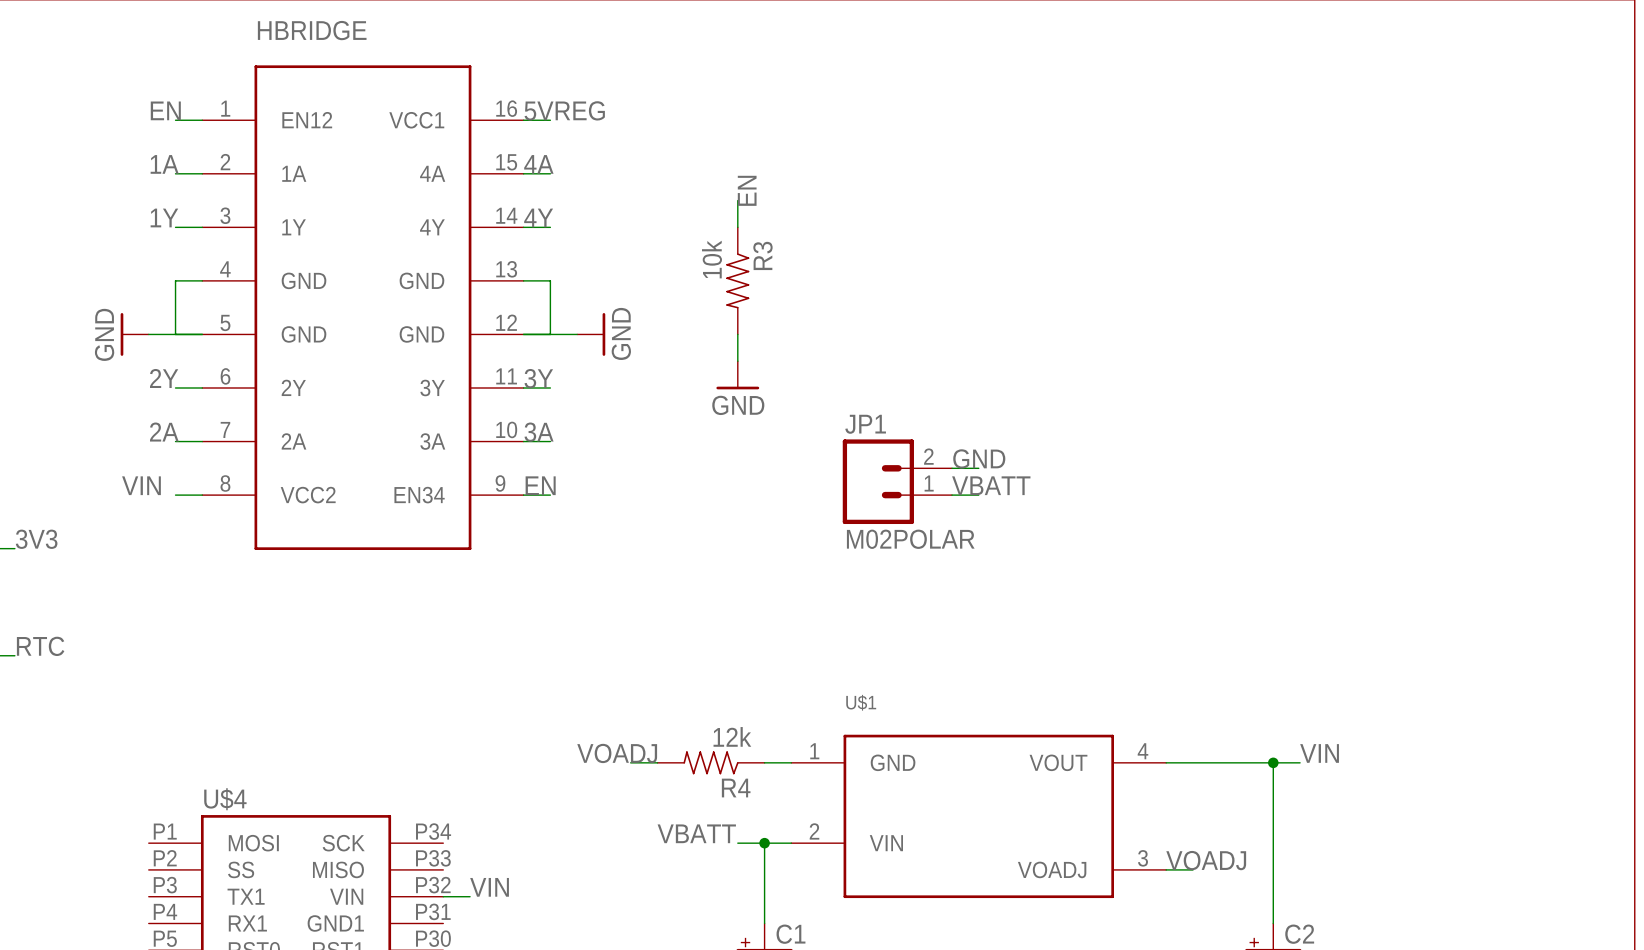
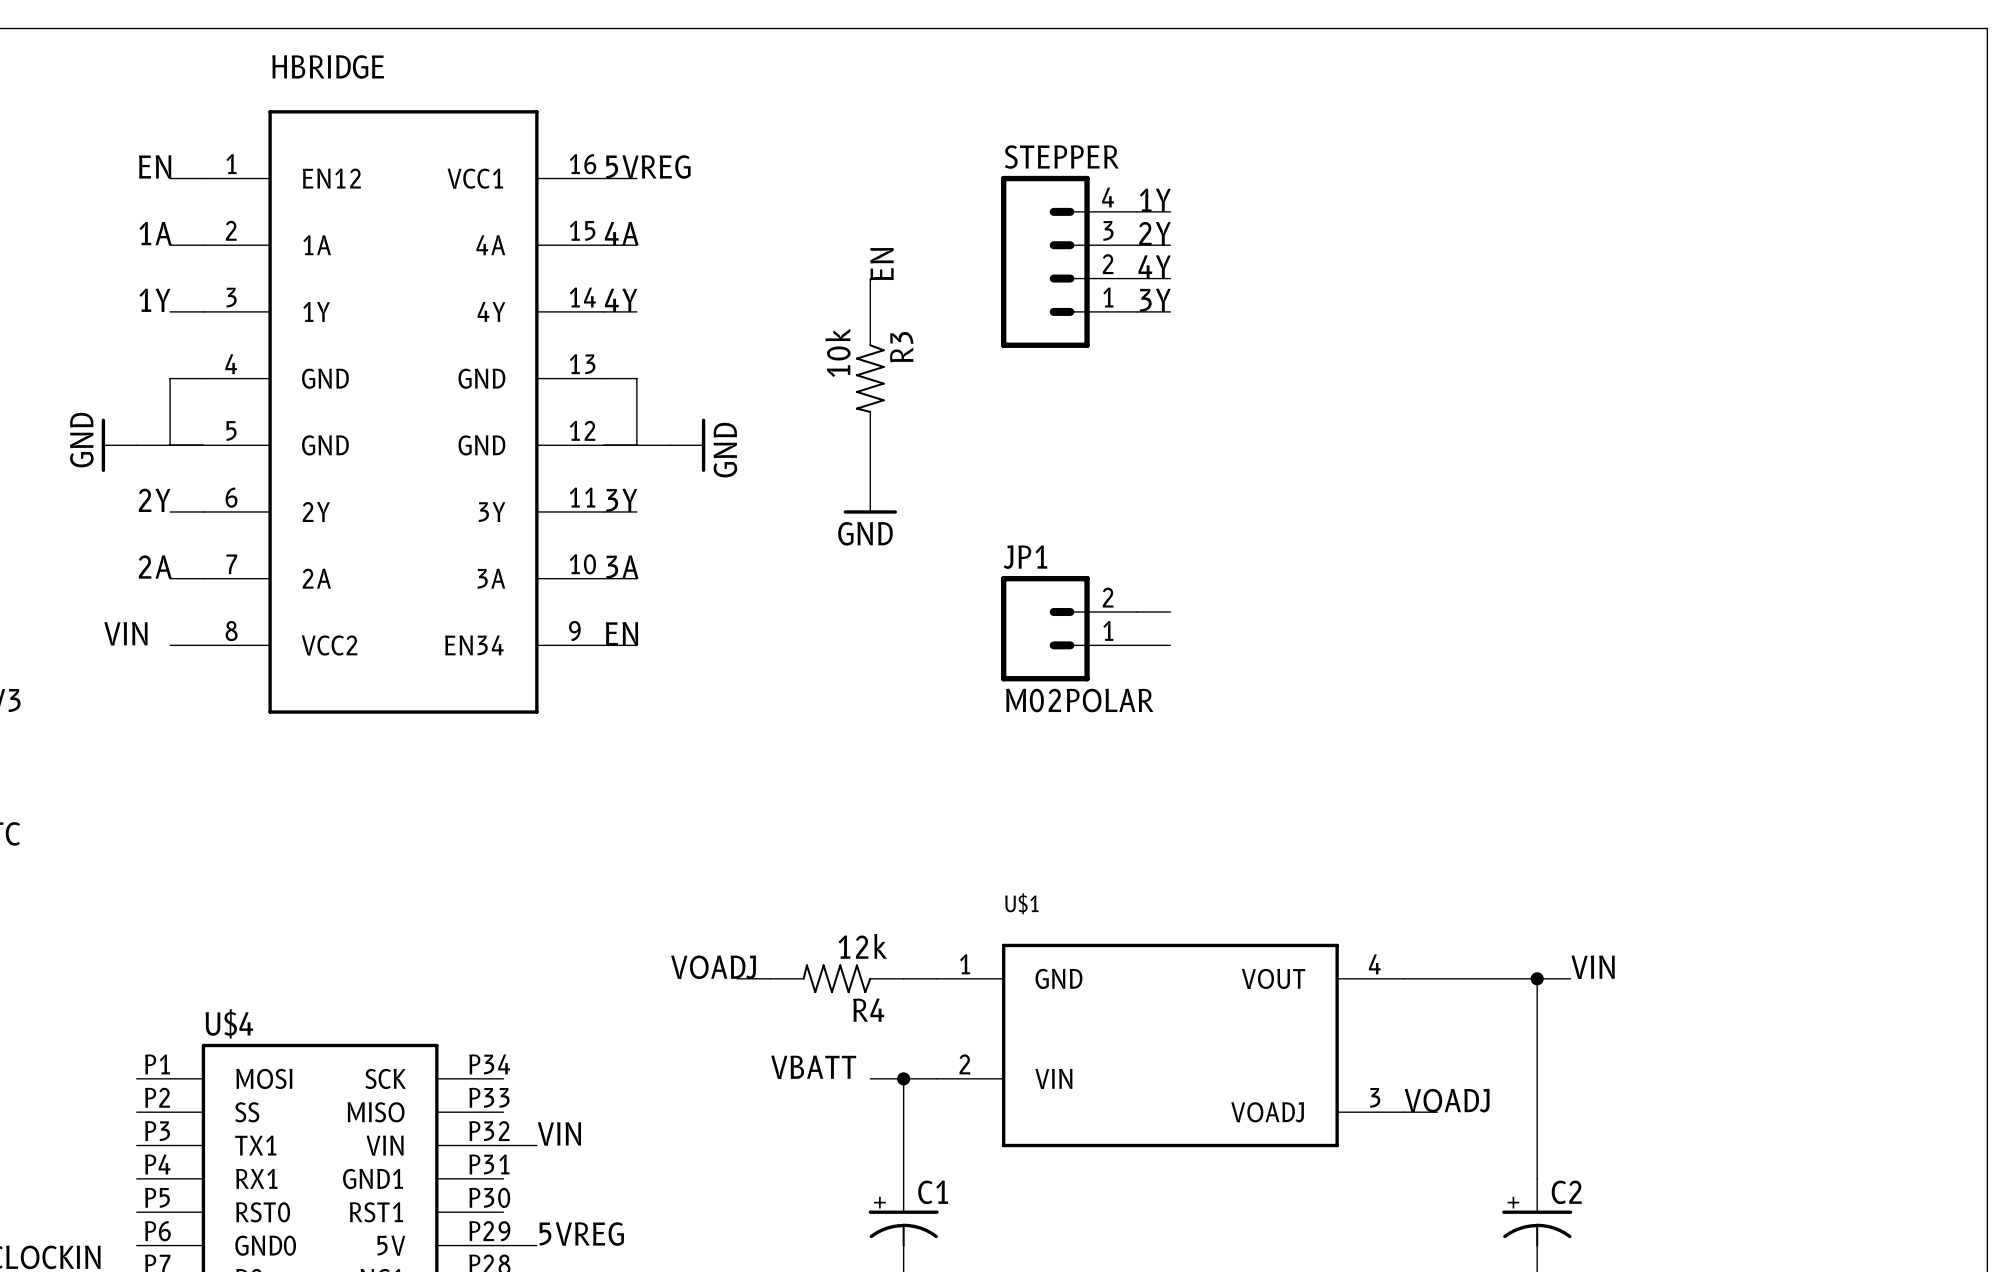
label: none -> 1Y (1155, 200)
wire: none -> (1137, 211) (1170, 211)
label: none -> 2Y (1154, 233)
wire: none -> (1137, 245) (1170, 245)
STEPPER: none -> (1069, 261)
label: none -> 4Y (1154, 266)
wire: none -> (1137, 278) (1170, 278)
label: none -> 3Y (1155, 300)
wire: none -> (1137, 311) (1170, 311)
label: GND (979, 458) -> none
label: VBATT (991, 485) -> none

